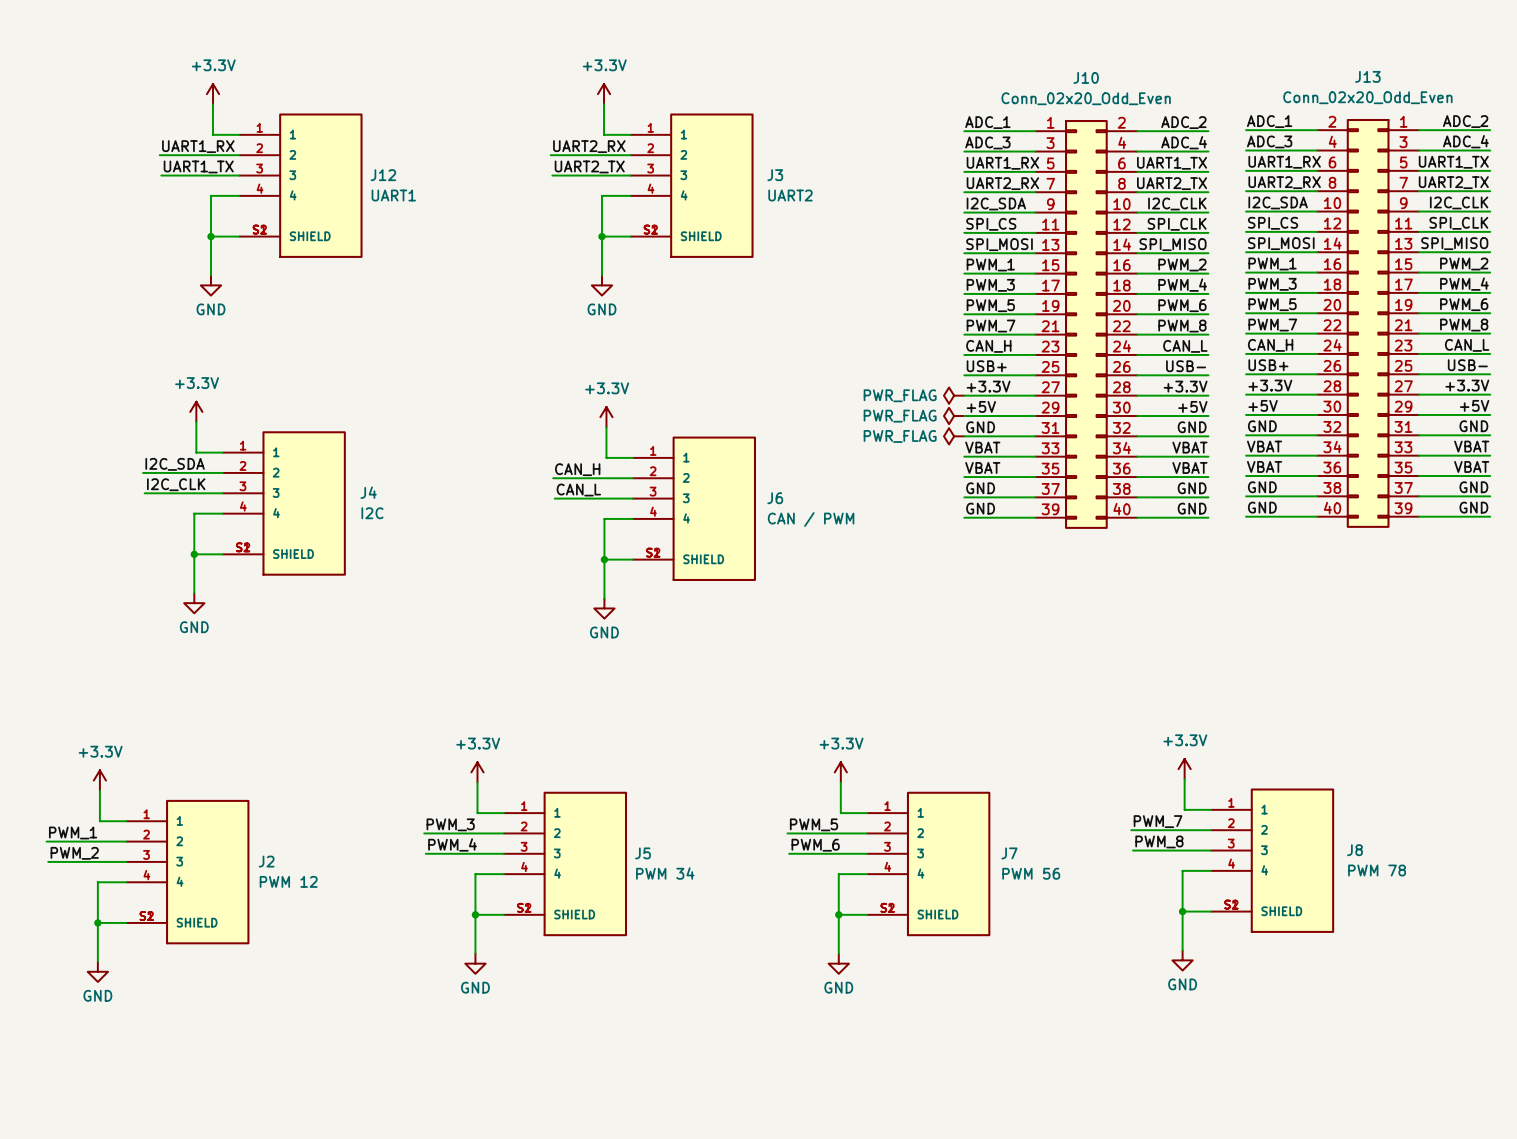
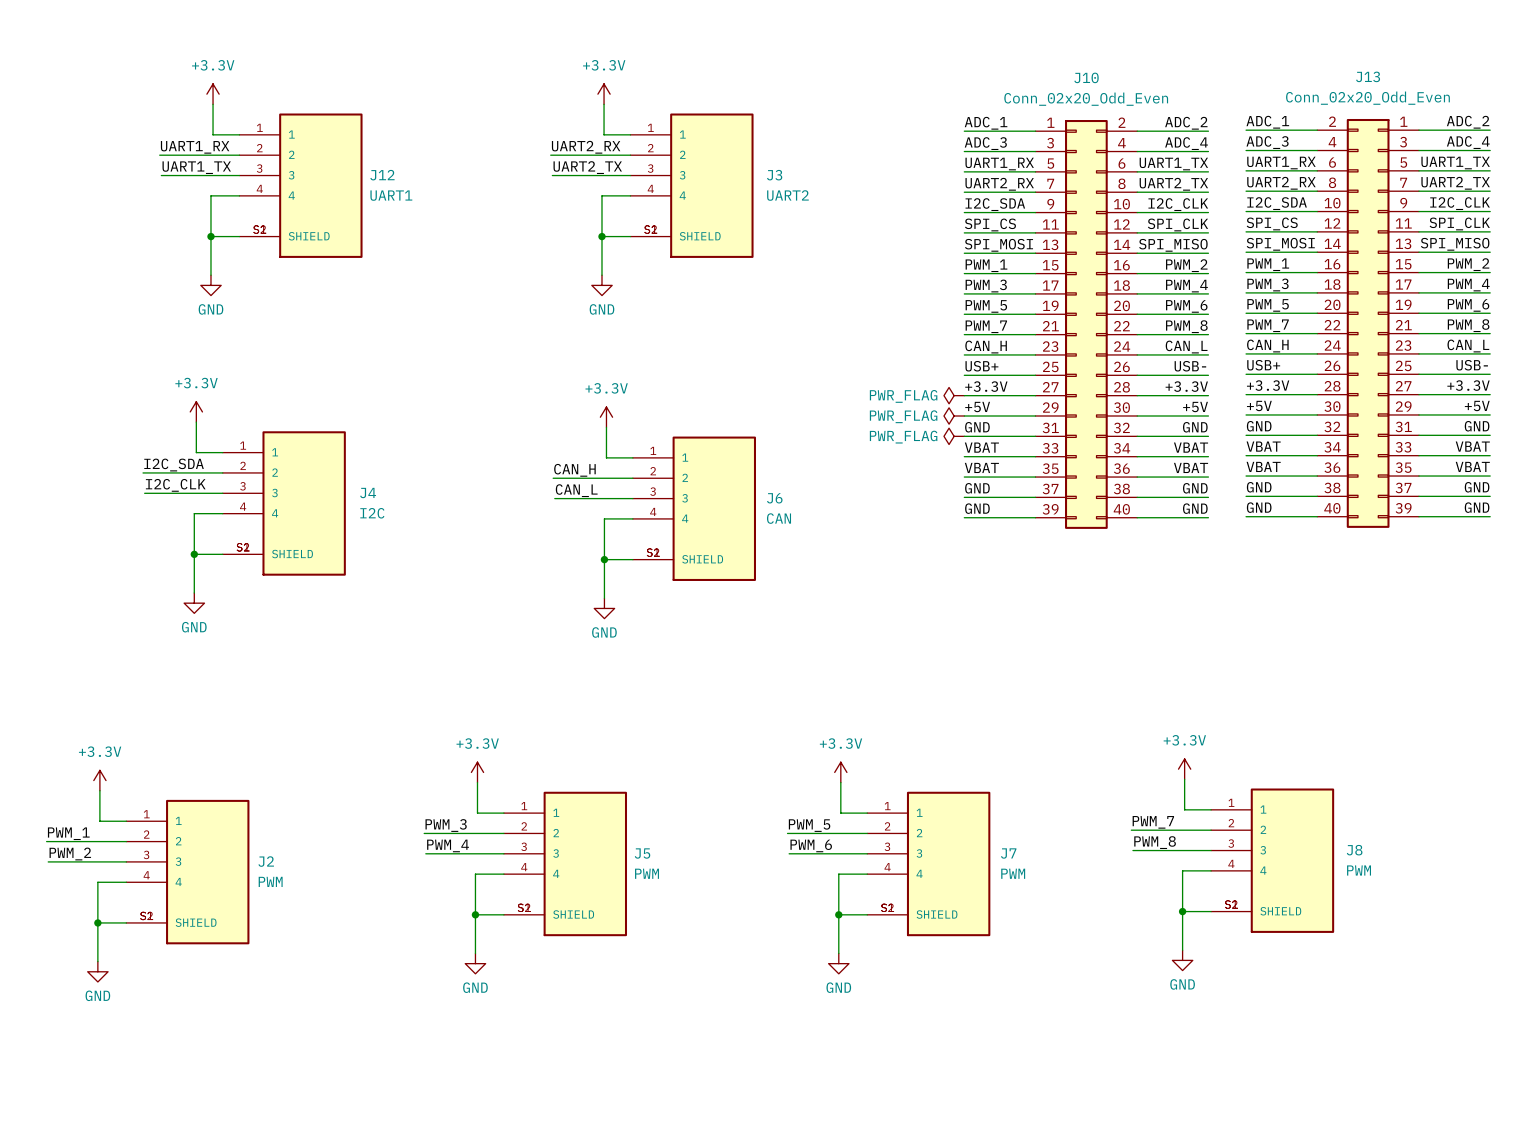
J6 value: CAN / PWM (811, 519) -> CAN (779, 518)
J8 value: PWM 78 (1377, 870) -> PWM (1359, 870)
J5 value: PWM 34 (665, 873) -> PWM (647, 873)
J7 value: PWM 56 (1031, 873) -> PWM (1013, 873)
J2 value: PWM 12 (288, 881) -> PWM (270, 881)

